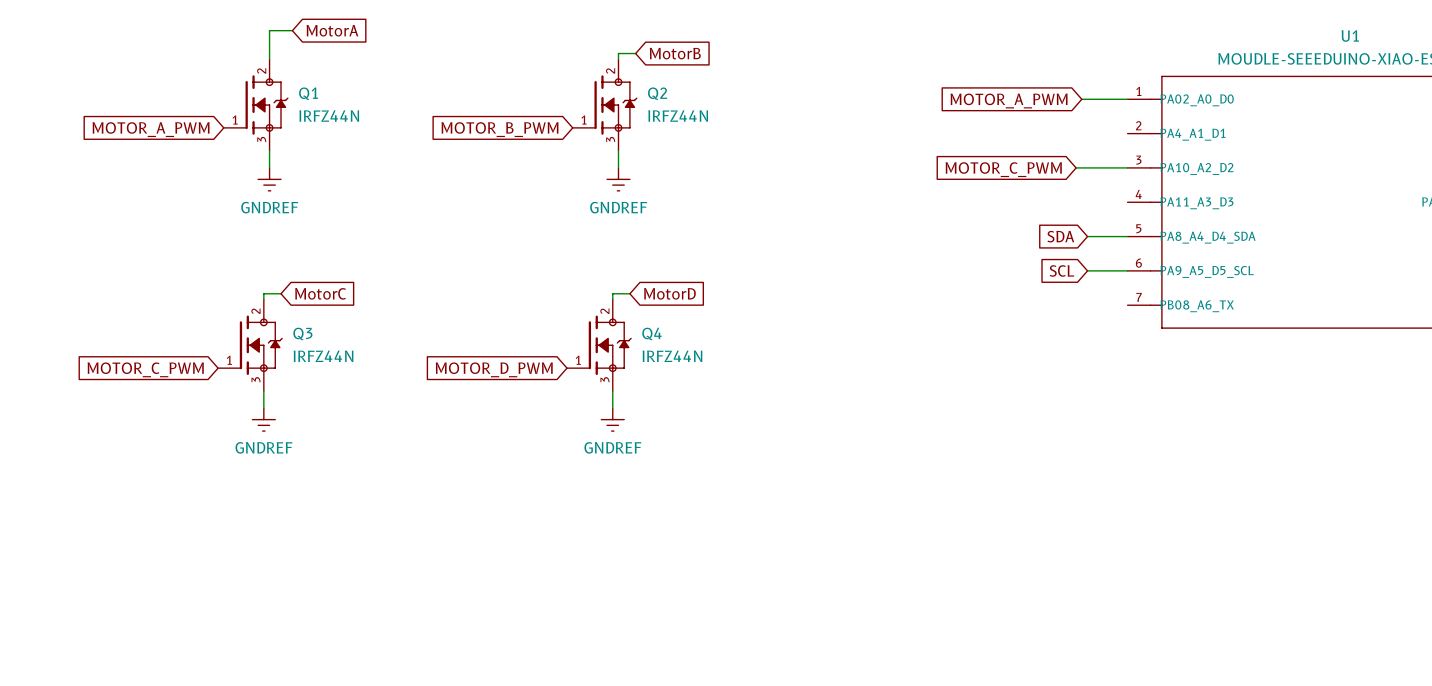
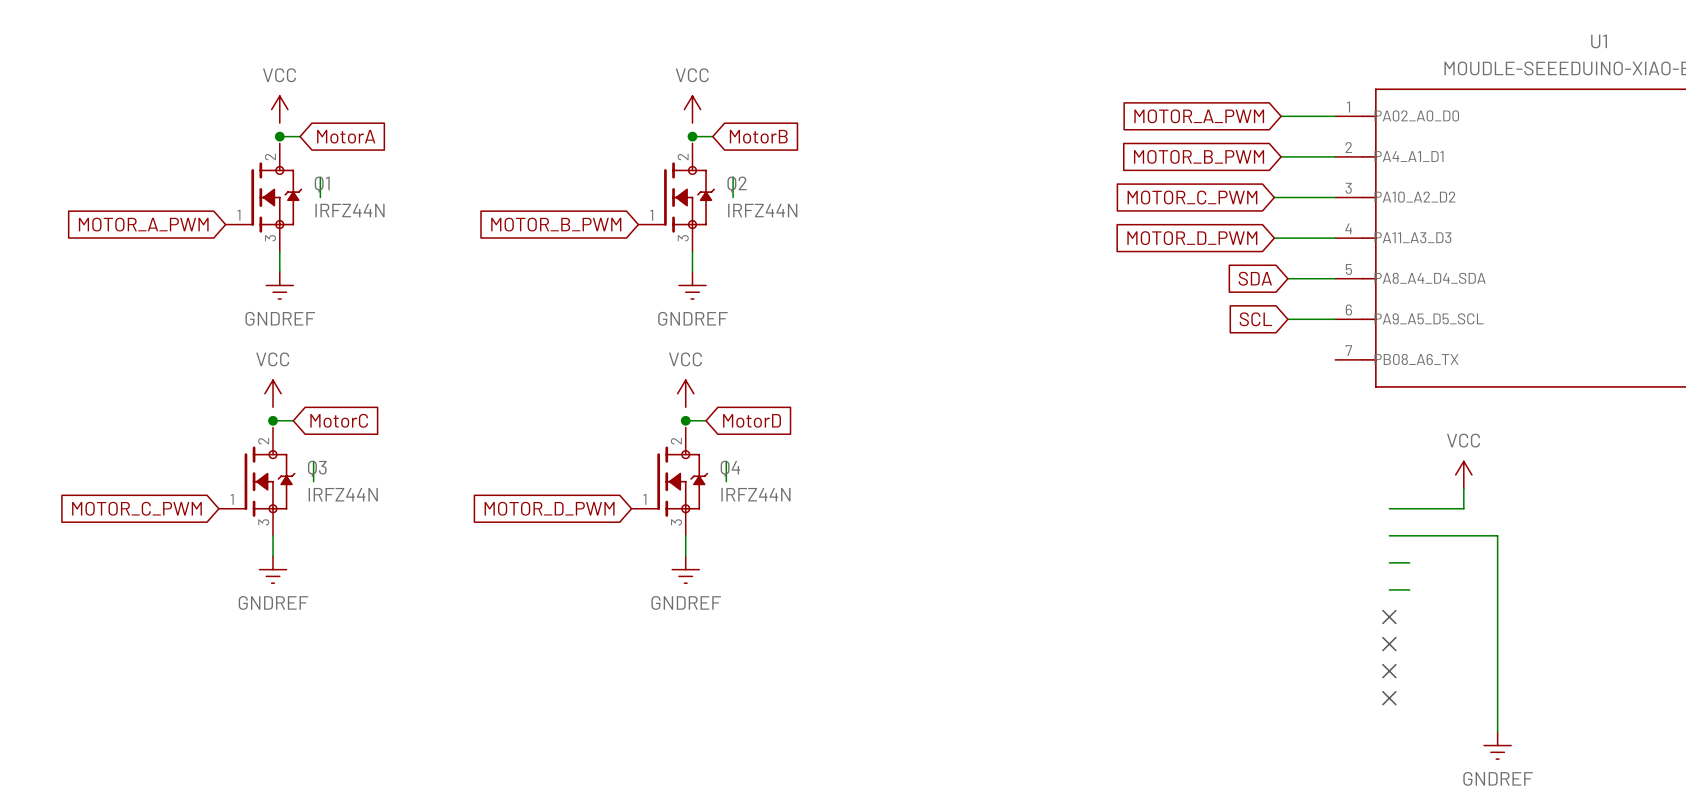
wire: (292, 30) (269, 30) (269, 59) -> none
global label position: MotorA (332, 30) -> MotorA (346, 136)
wire: (635, 53) (618, 53) (618, 59) -> none
global label position: MotorB (675, 53) -> MotorB (758, 136)
power symbol: none -> VCC (279, 109)
power symbol: none -> VCC (692, 109)
Q1 position: (256, 105) -> (263, 197)
Q2 position: (605, 105) -> (676, 197)
wire: none -> (279, 136) (300, 136)
junction: none -> (279, 136)
wire: none -> (692, 136) (712, 136)
junction: none -> (692, 136)
global label position: MOTOR_A_PWM (151, 129) -> MOTOR_A_PWM (143, 224)
global label position: MOTOR_B_PWM (499, 129) -> MOTOR_B_PWM (556, 224)
wire: none -> (1281, 156) (1335, 156)
global label: none -> MOTOR_B_PWM (1199, 156)
power symbol position: GNDREF (269, 179) -> GNDREF (279, 285)
power symbol position: GNDREF (618, 179) -> GNDREF (692, 285)
wire: none -> (1274, 238) (1335, 238)
global label: none -> MOTOR_D_PWM (1192, 238)
wire: none -> (279, 251) (279, 271)
wire: none -> (692, 251) (692, 271)
wire: (281, 293) (263, 293) (263, 299) -> none
global label position: MotorC (320, 293) -> MotorC (339, 420)
wire: (629, 293) (612, 293) (612, 299) -> none
global label position: MotorD (669, 293) -> MotorD (752, 420)
power symbol: none -> VCC (273, 393)
power symbol: none -> VCC (685, 393)
Q3 position: (250, 345) -> (257, 481)
Q4 position: (599, 345) -> (669, 481)
wire: none -> (273, 420) (293, 420)
junction: none -> (273, 420)
wire: none -> (685, 420) (706, 420)
junction: none -> (685, 420)
global label position: MOTOR_C_PWM (145, 369) -> MOTOR_C_PWM (136, 508)
global label position: MOTOR_D_PWM (494, 369) -> MOTOR_D_PWM (549, 508)
power symbol: none -> VCC (1463, 474)
wire: none -> (1463, 488) (1463, 508) (1389, 508)
power symbol position: GNDREF (263, 419) -> GNDREF (273, 569)
power symbol position: GNDREF (612, 419) -> GNDREF (685, 569)
wire: none -> (273, 535) (273, 556)
wire: none -> (685, 535) (685, 556)
wire: none -> (1389, 535) (1497, 535) (1497, 732)
wire: none -> (1389, 562) (1409, 562)
wire: none -> (1389, 589) (1409, 589)
no-connect mark: none -> (1389, 617)
no-connect mark: none -> (1389, 644)
no-connect mark: none -> (1389, 671)
no-connect mark: none -> (1389, 698)
power symbol: none -> GNDREF (1497, 745)

